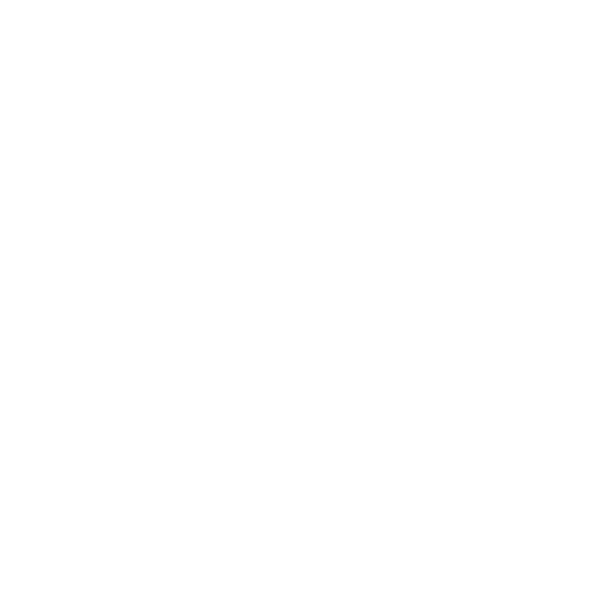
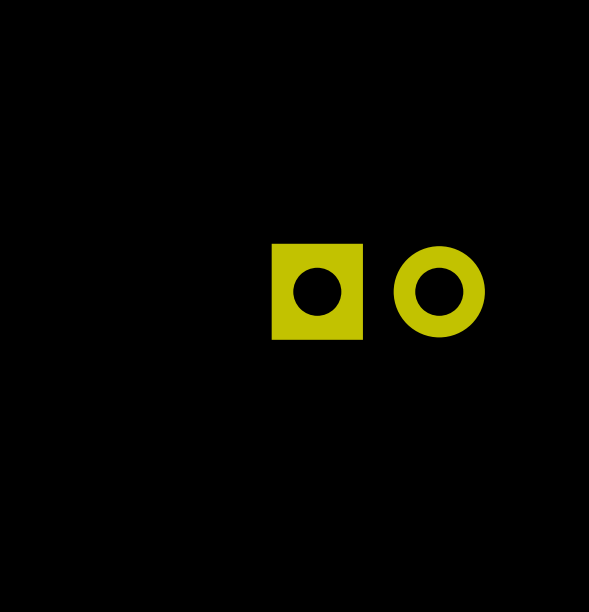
part: none -> (378, 291)

